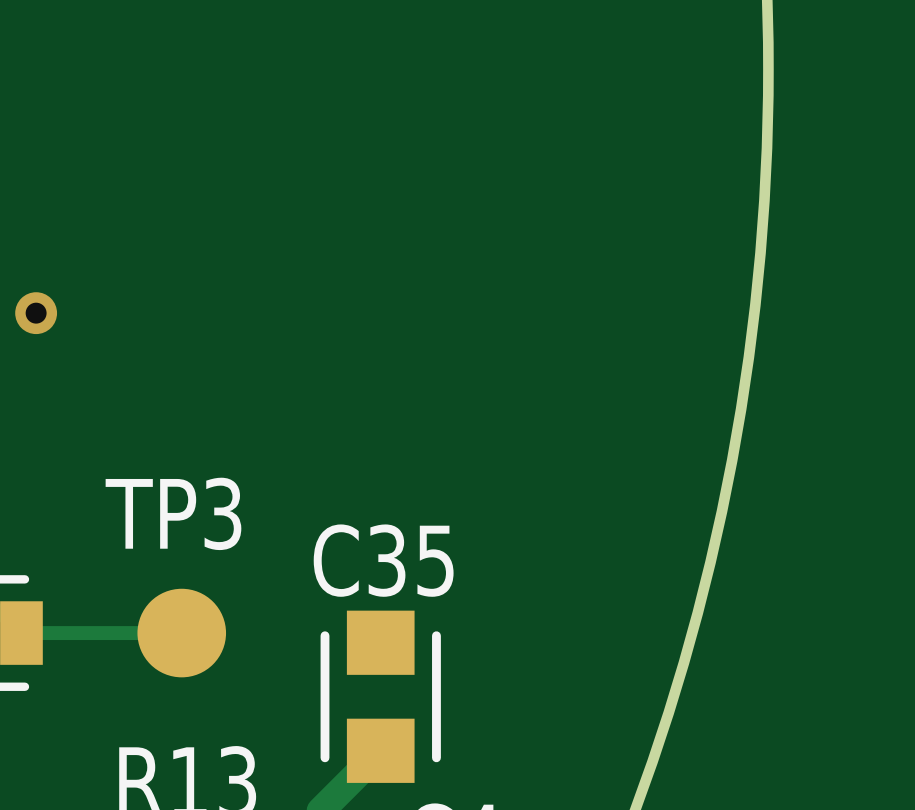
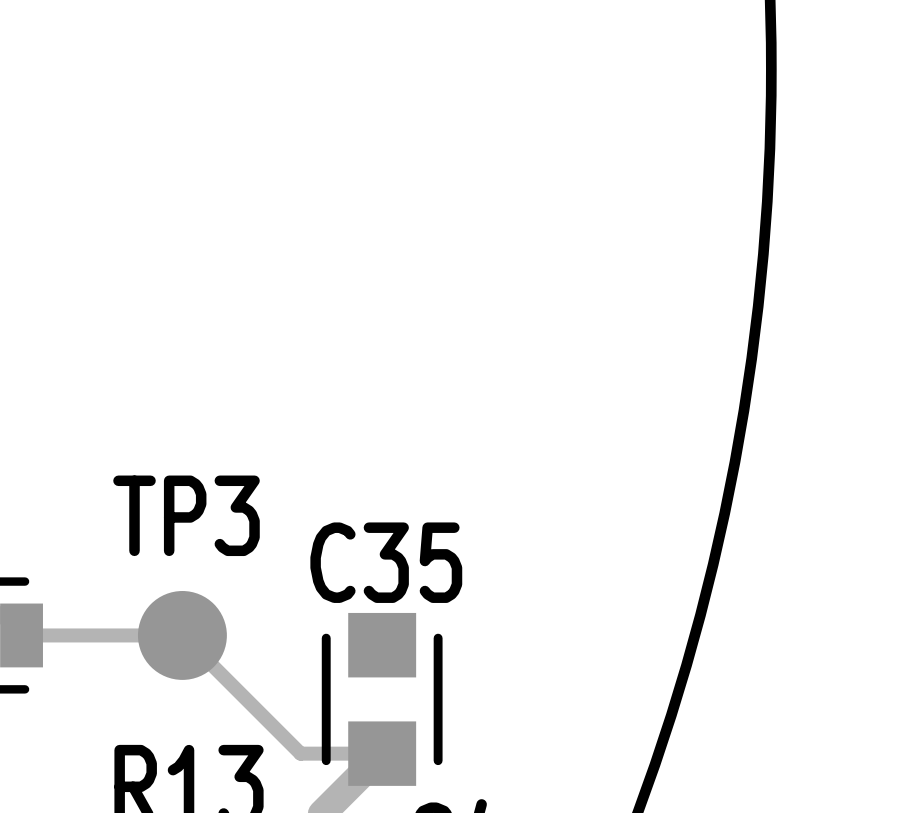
via: (36, 313) -> none
track: none -> (182, 635) (300, 753) (382, 753)

